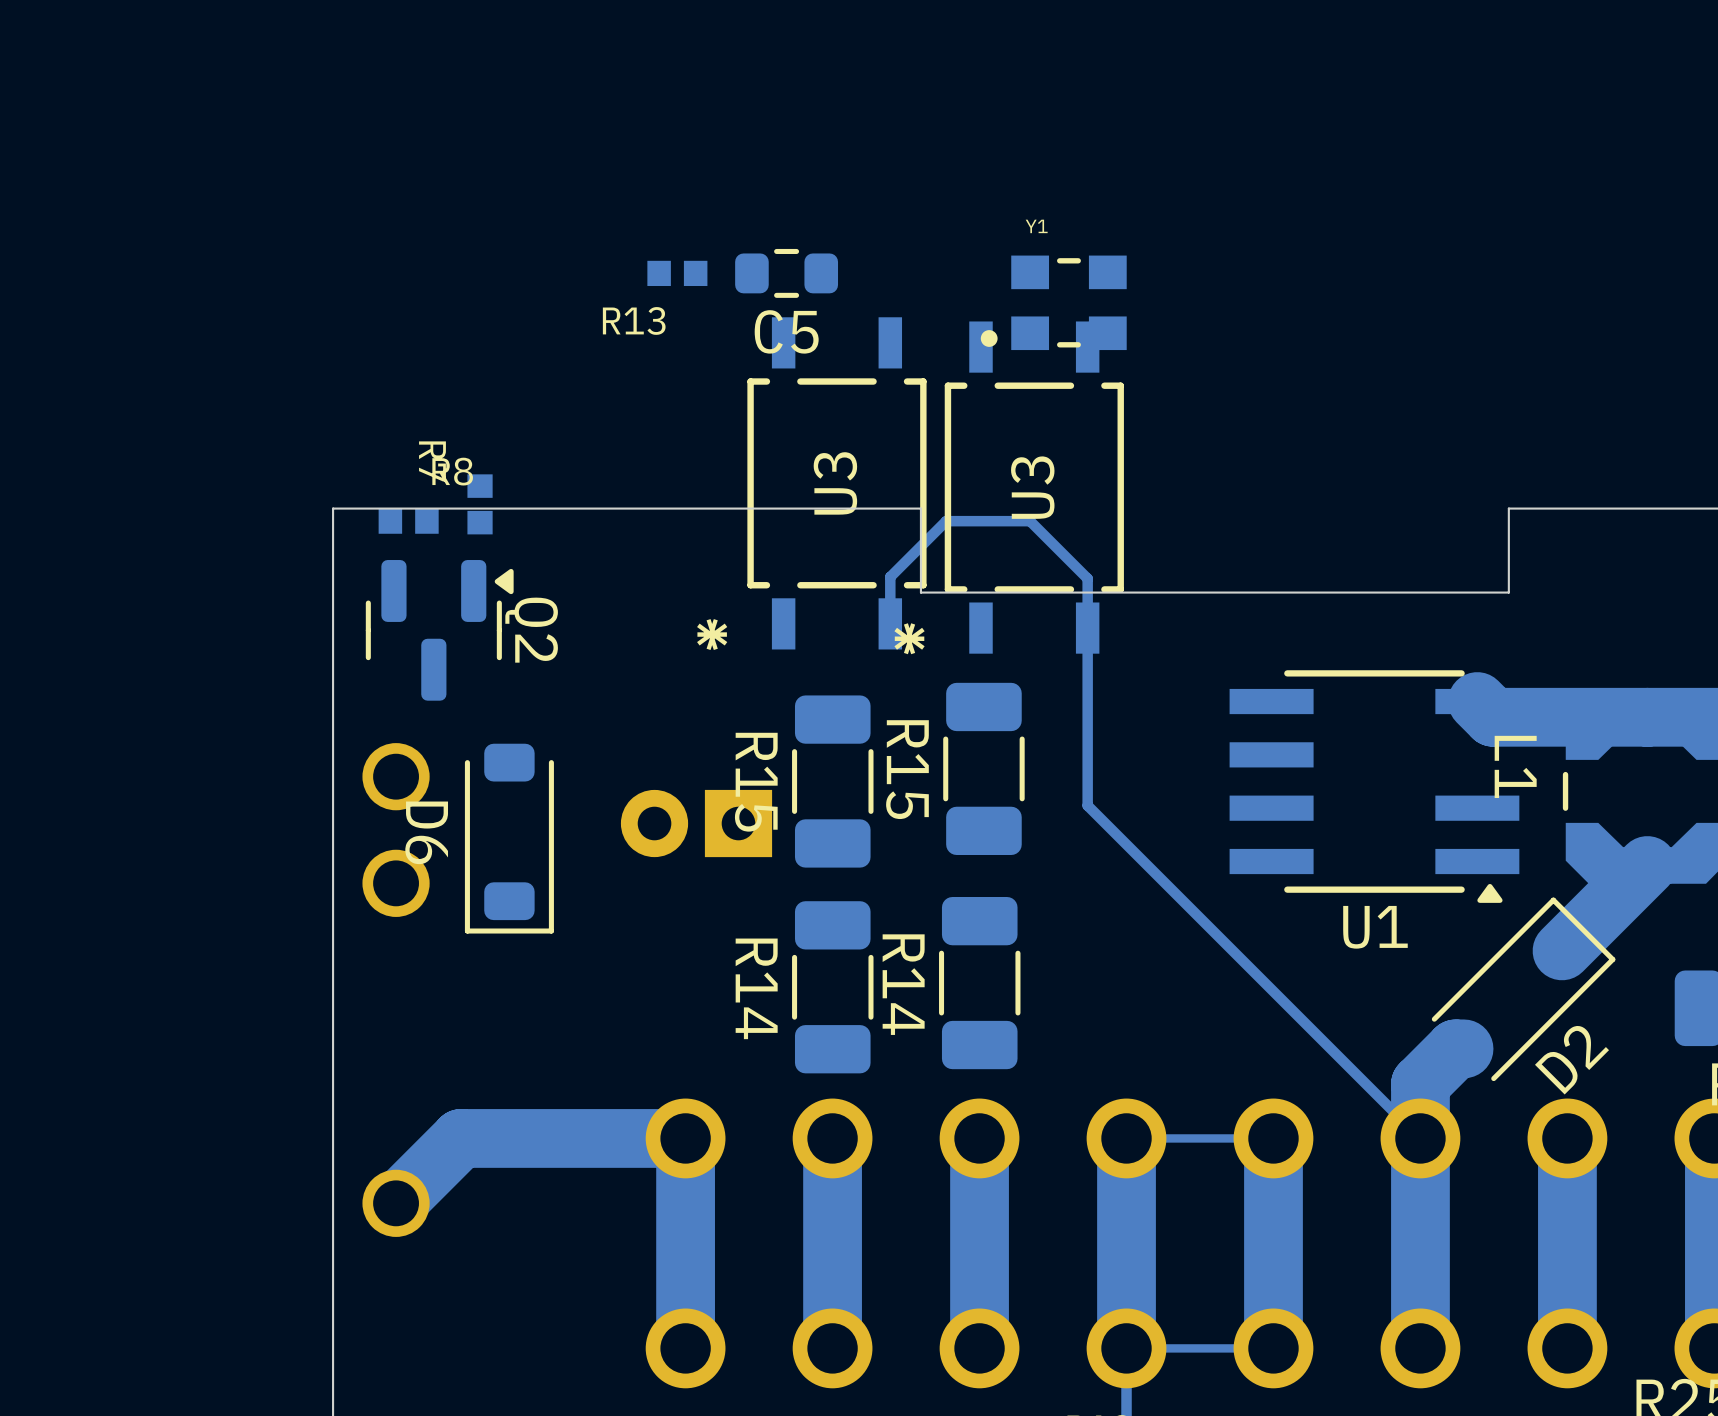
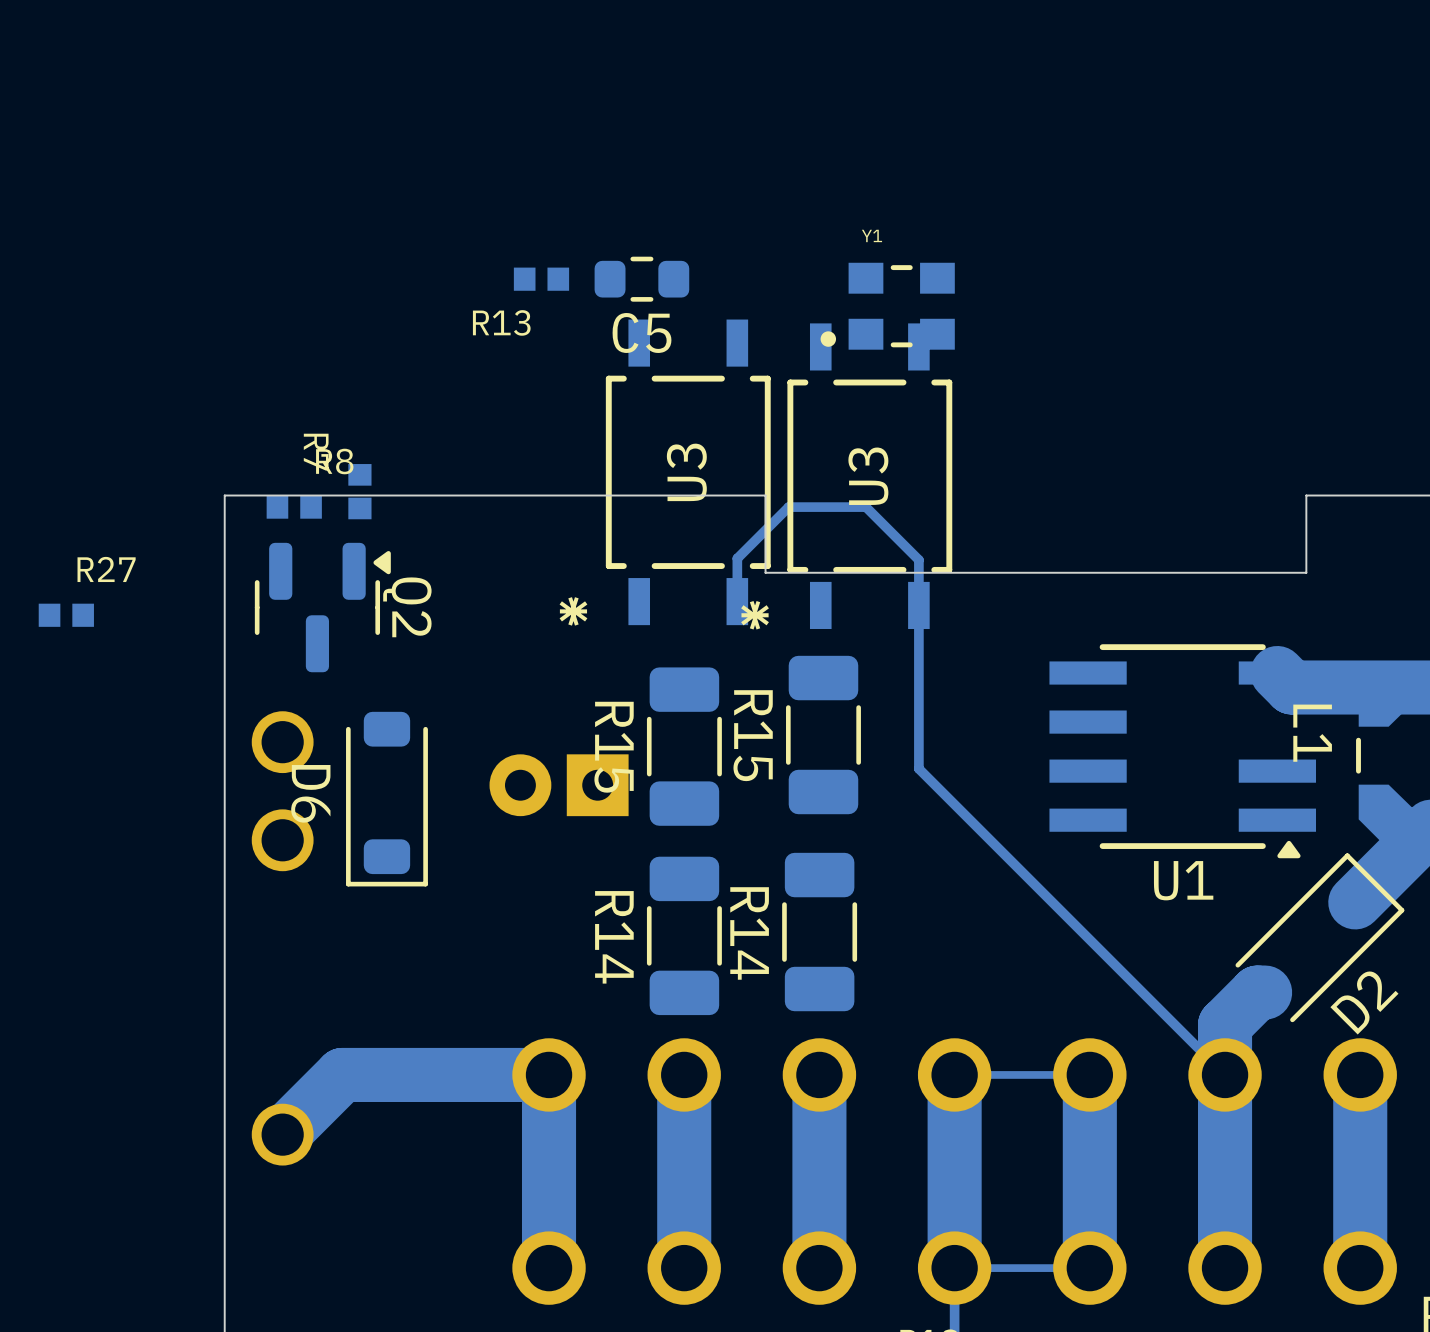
R27: none -> (66, 615)

